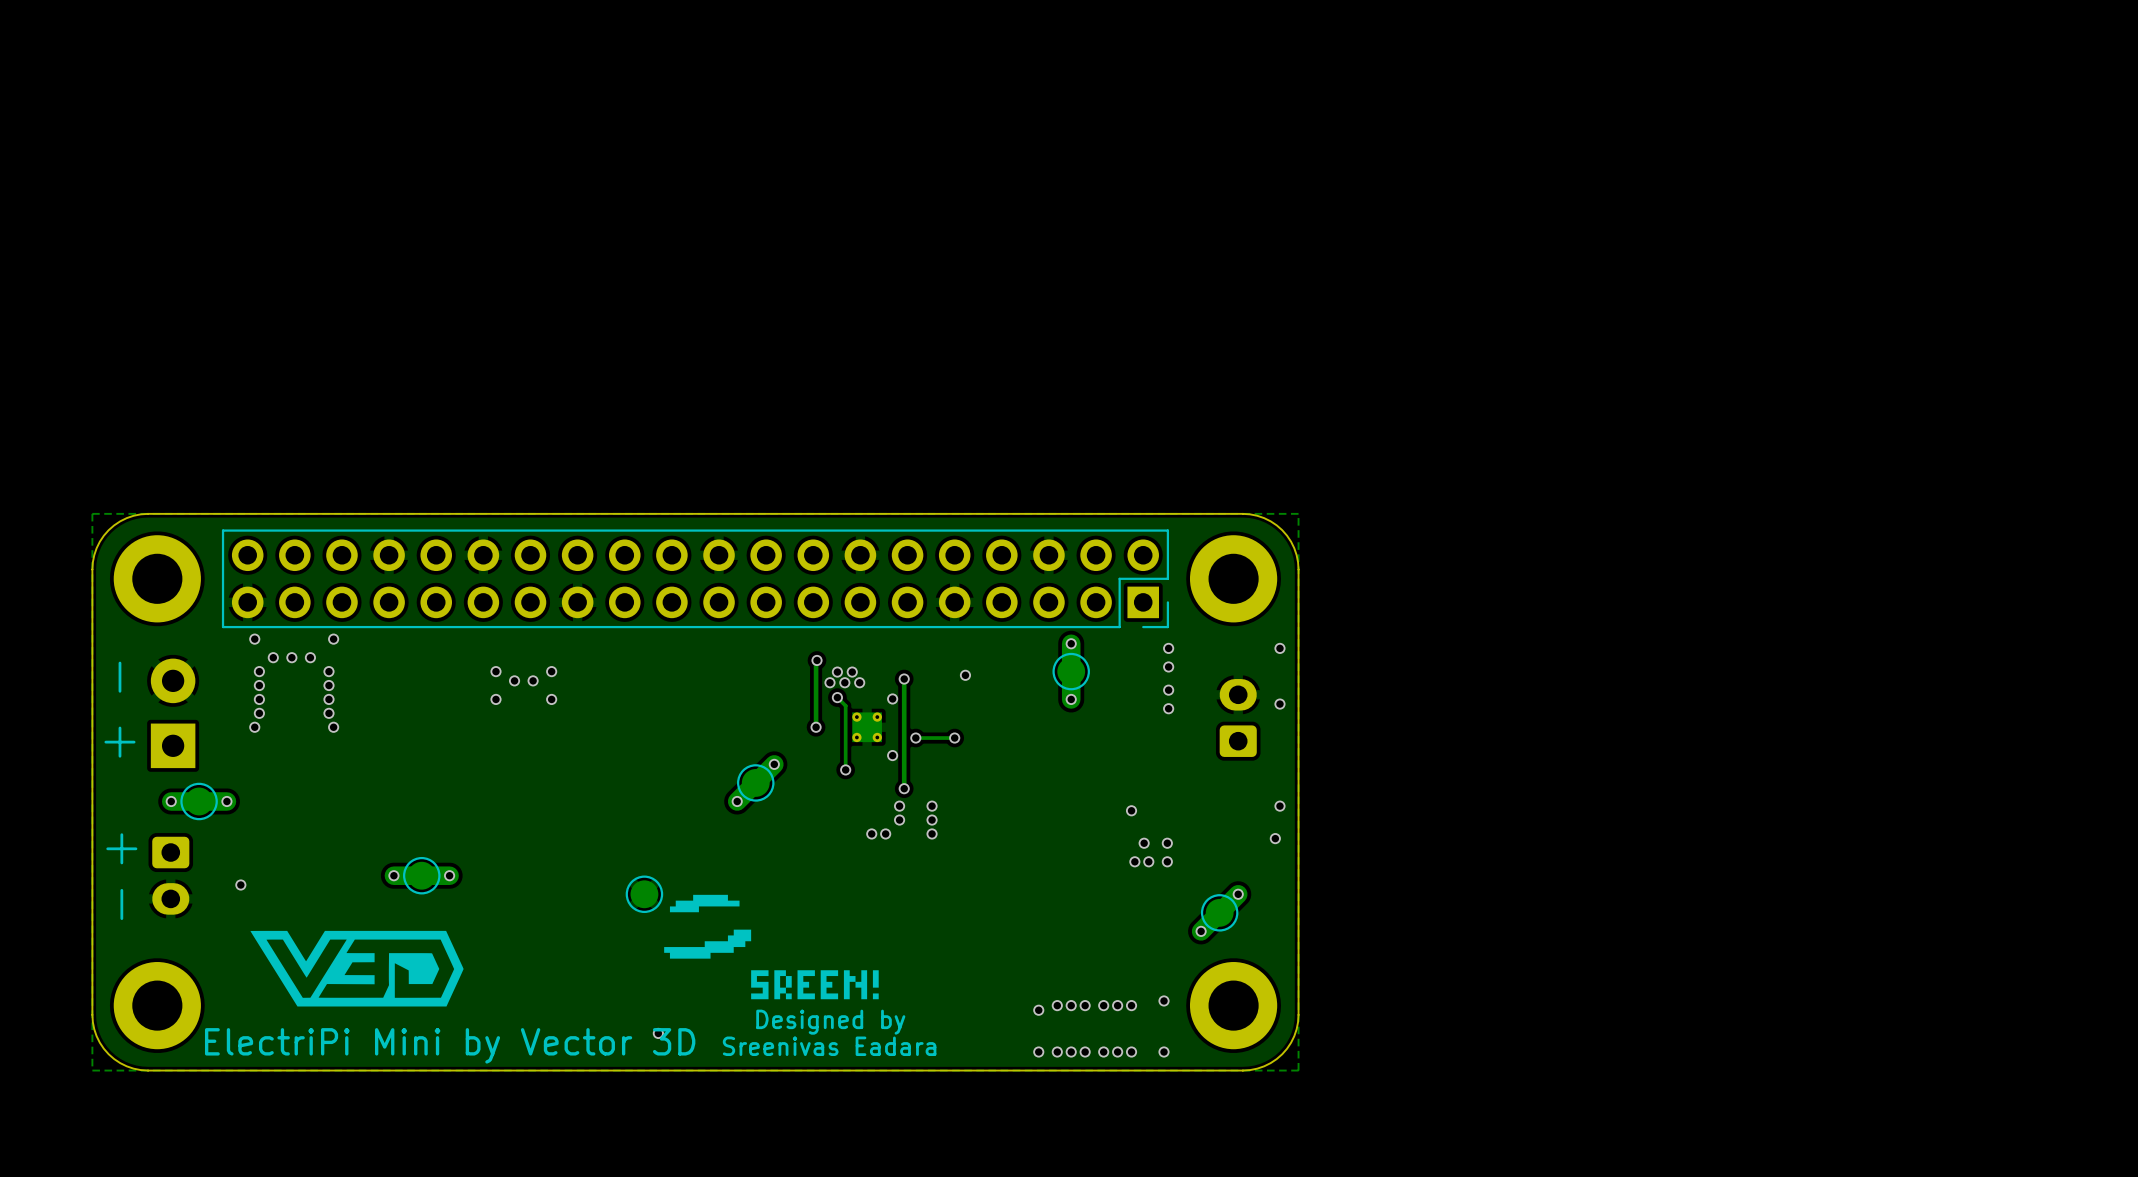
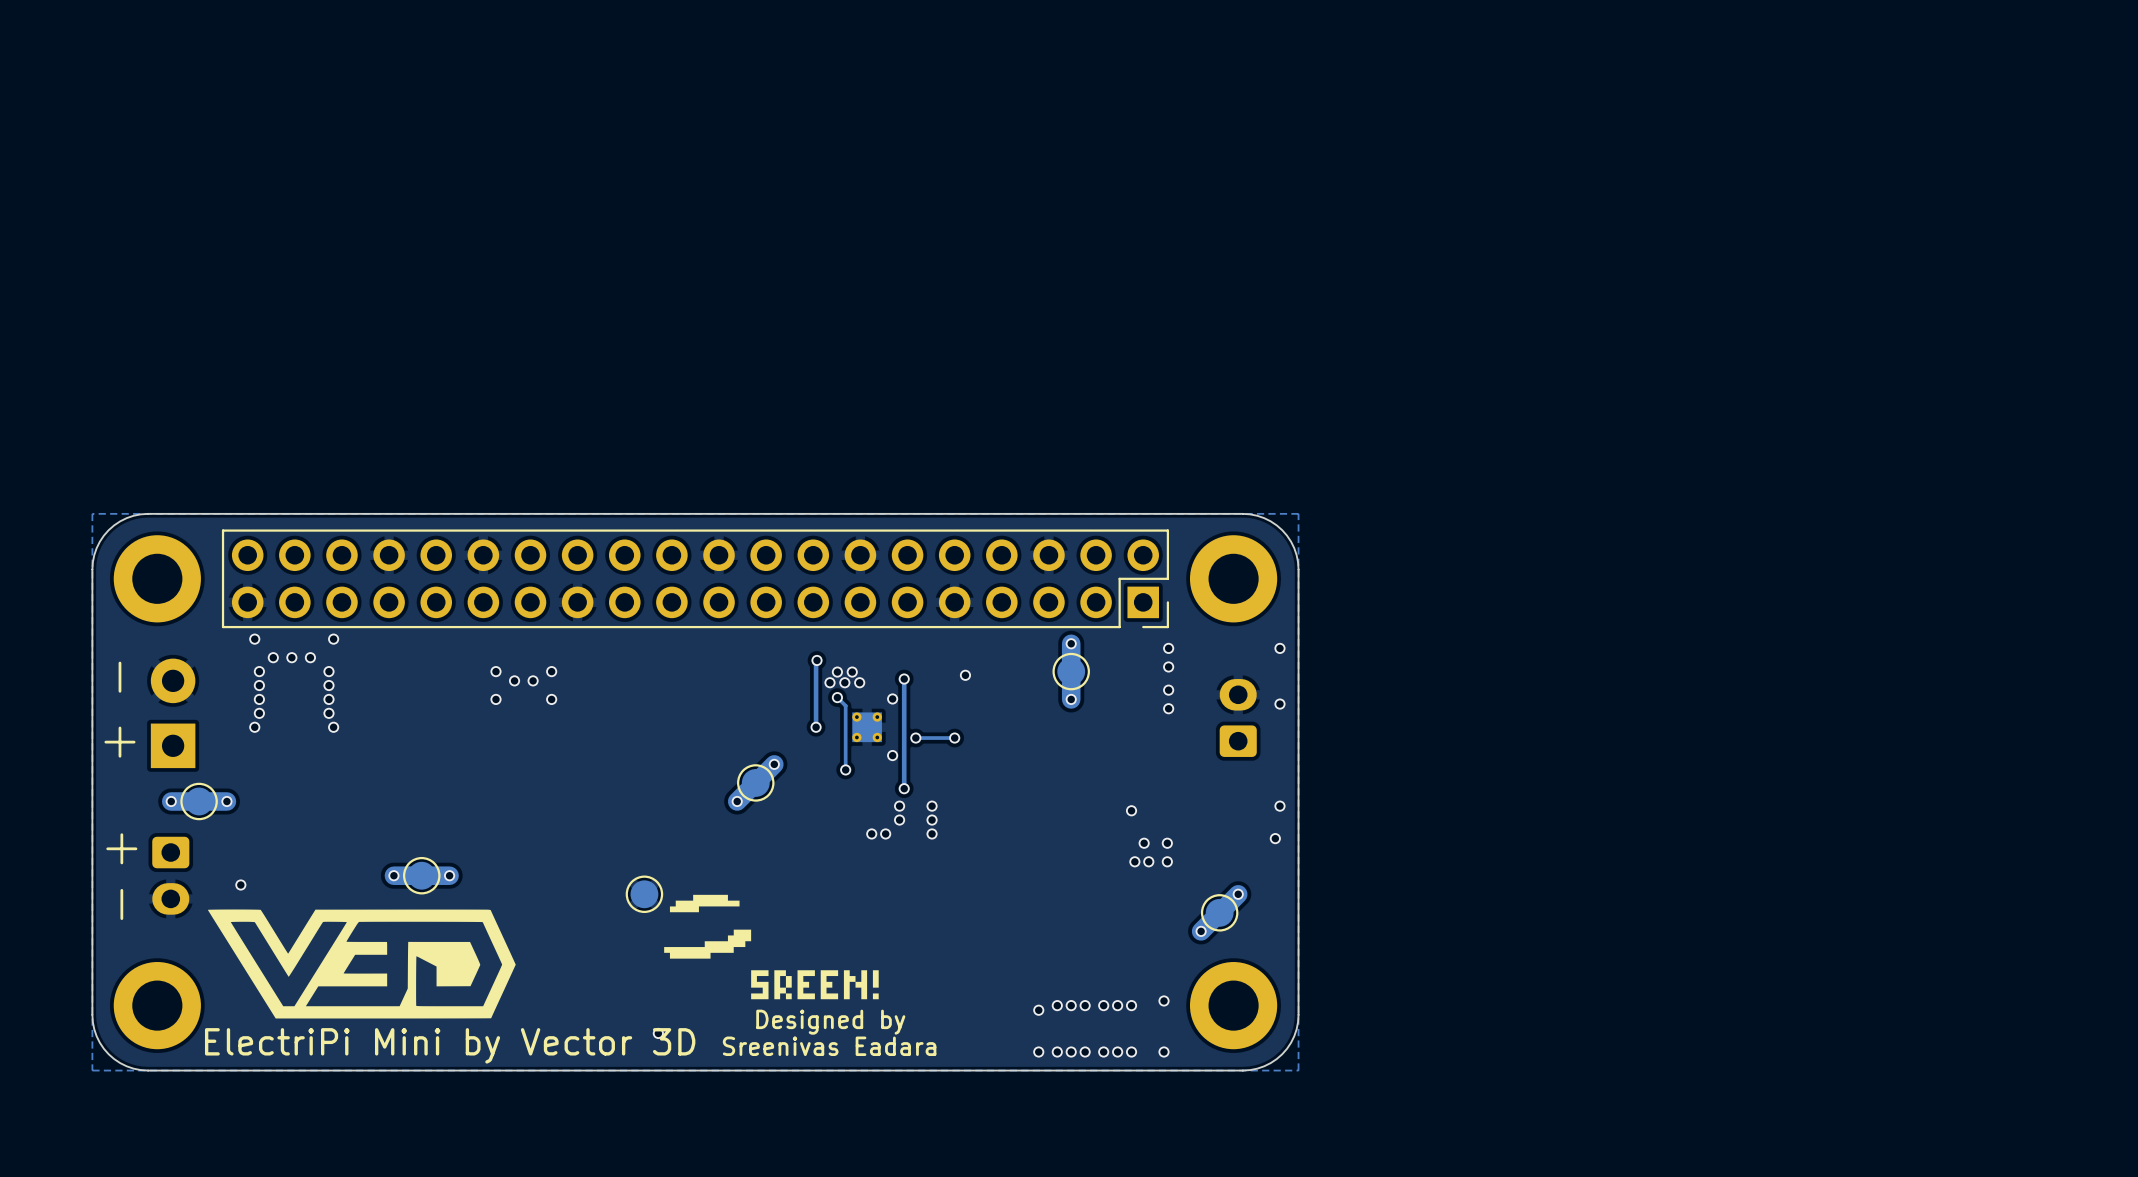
drawing shape: [250, 930, 464, 1007] -> [207, 909, 516, 1019]

